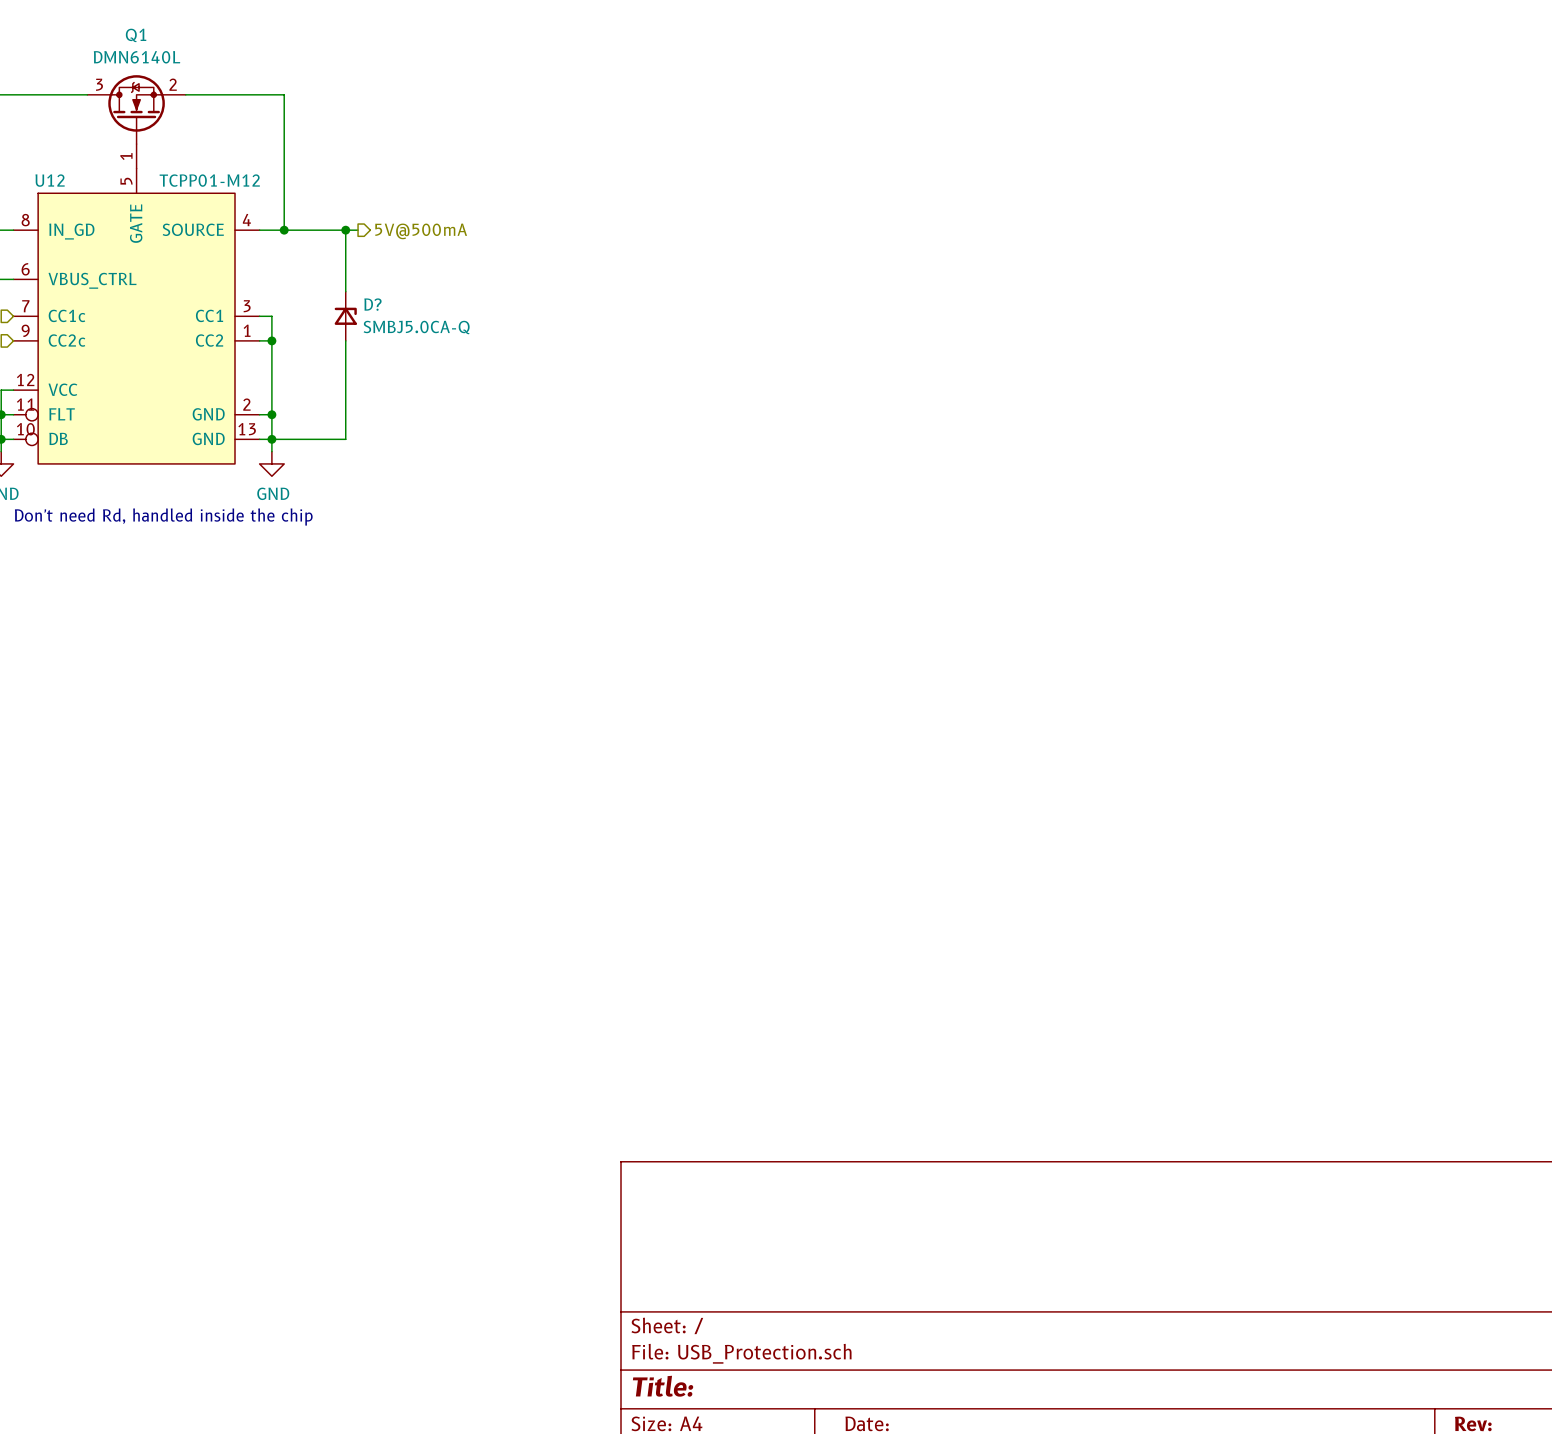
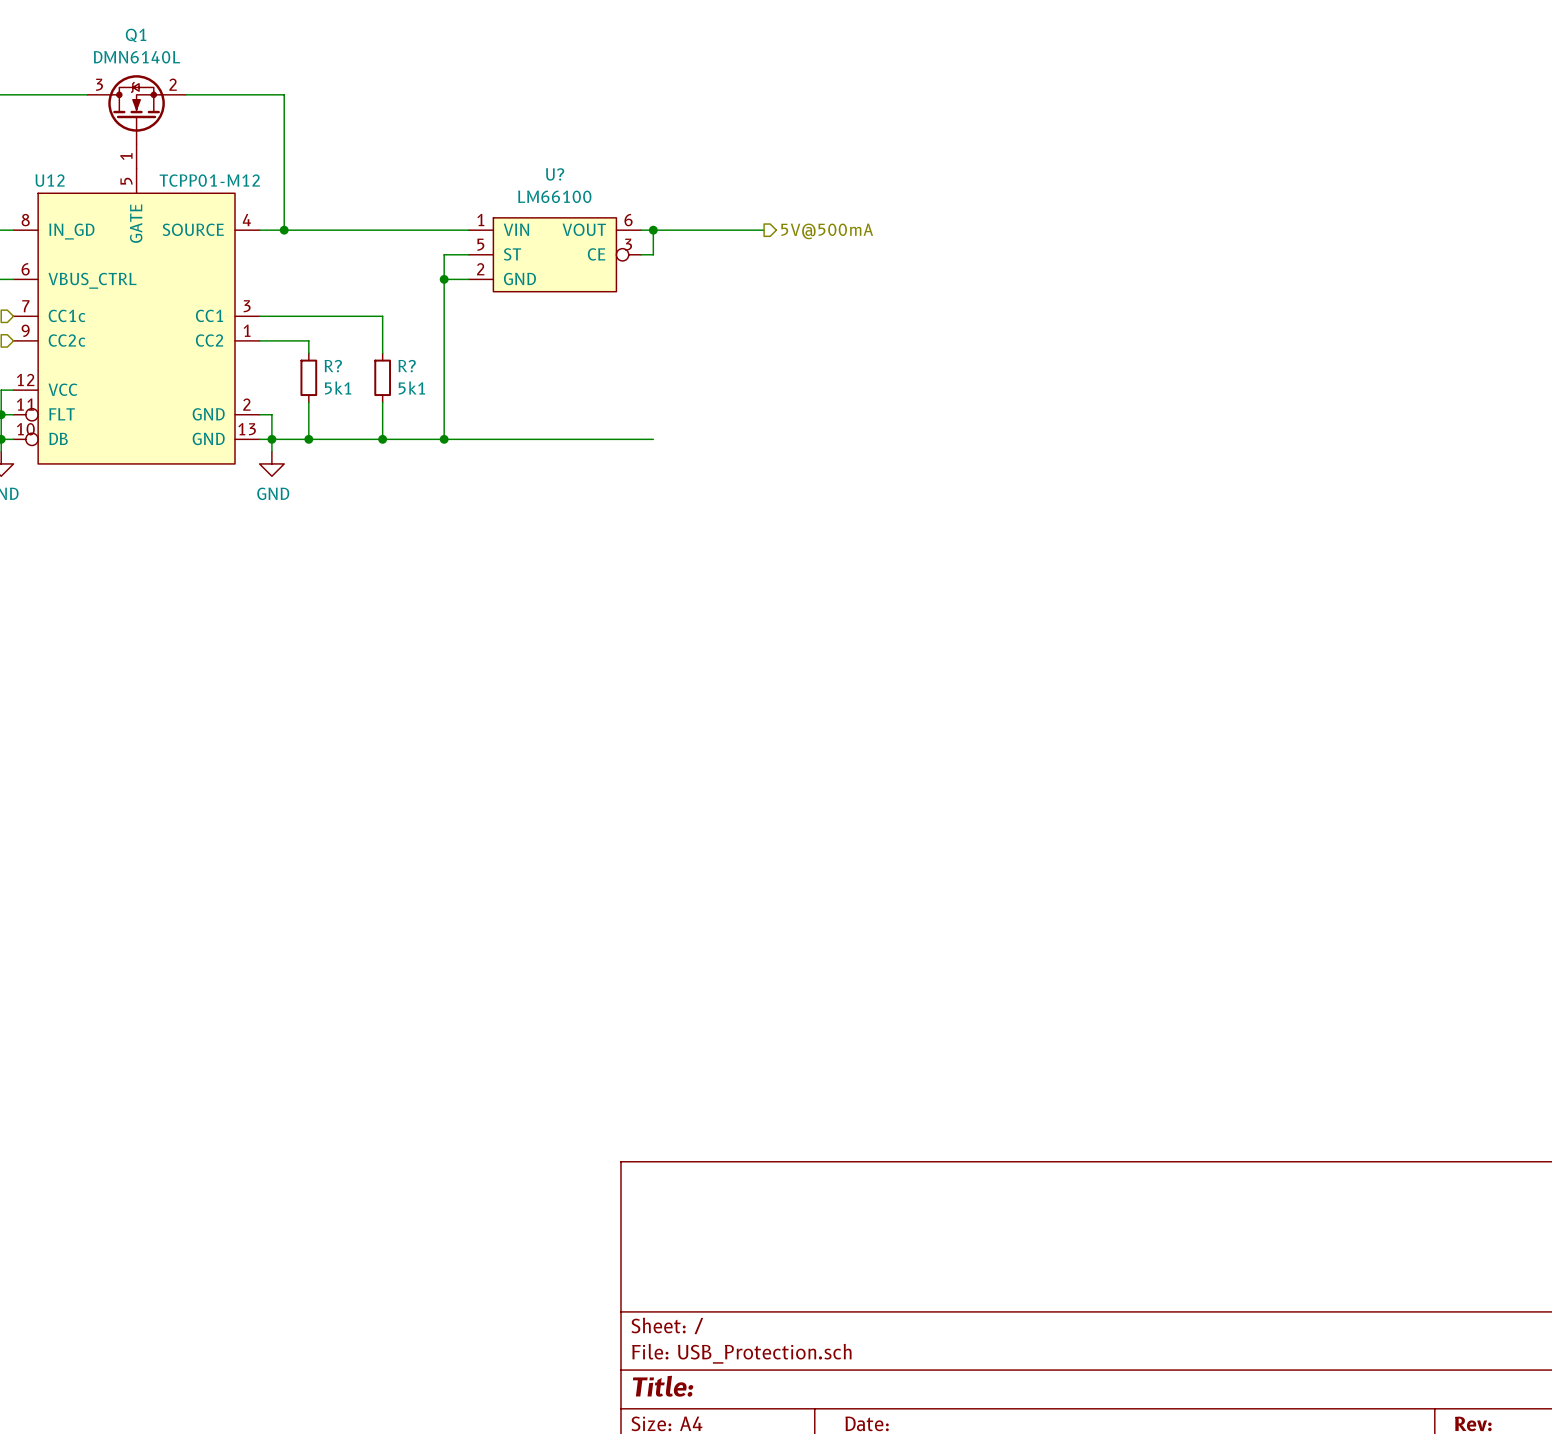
wire: (345, 230) (345, 291) -> none
junction: (345, 230) -> none
wire: none -> (358, 230) (468, 230)
wire: none -> (641, 230) (764, 230)
wire: none -> (653, 230) (653, 254) (641, 254)
junction: none -> (653, 230)
hierarchical label: 5V@500mA (421, 231) -> none
hierarchical label: none -> 5V@500mA (827, 231)
wire: none -> (468, 254) (444, 254) (444, 439)
U?: none -> LM66100 (554, 254)
wire: none -> (444, 279) (468, 279)
junction: none -> (444, 279)
wire: (271, 316) (271, 414) -> (271, 316) (382, 316) (382, 353)
D?: SMBJ5.0CA-Q (345, 316) -> none
wire: none -> (271, 340) (308, 340) (308, 353)
junction: (271, 340) -> none
wire: (345, 340) (345, 439) -> (653, 439) (345, 439)
R?: none -> 5k1 (308, 377)
R?: none -> 5k1 (382, 377)
wire: none -> (308, 402) (308, 439)
wire: none -> (382, 402) (382, 439)
junction position: (271, 414) -> (308, 439)
junction: none -> (382, 439)
junction: none -> (444, 439)
text: Don't need Rd, handled inside the chip (163, 517) -> none

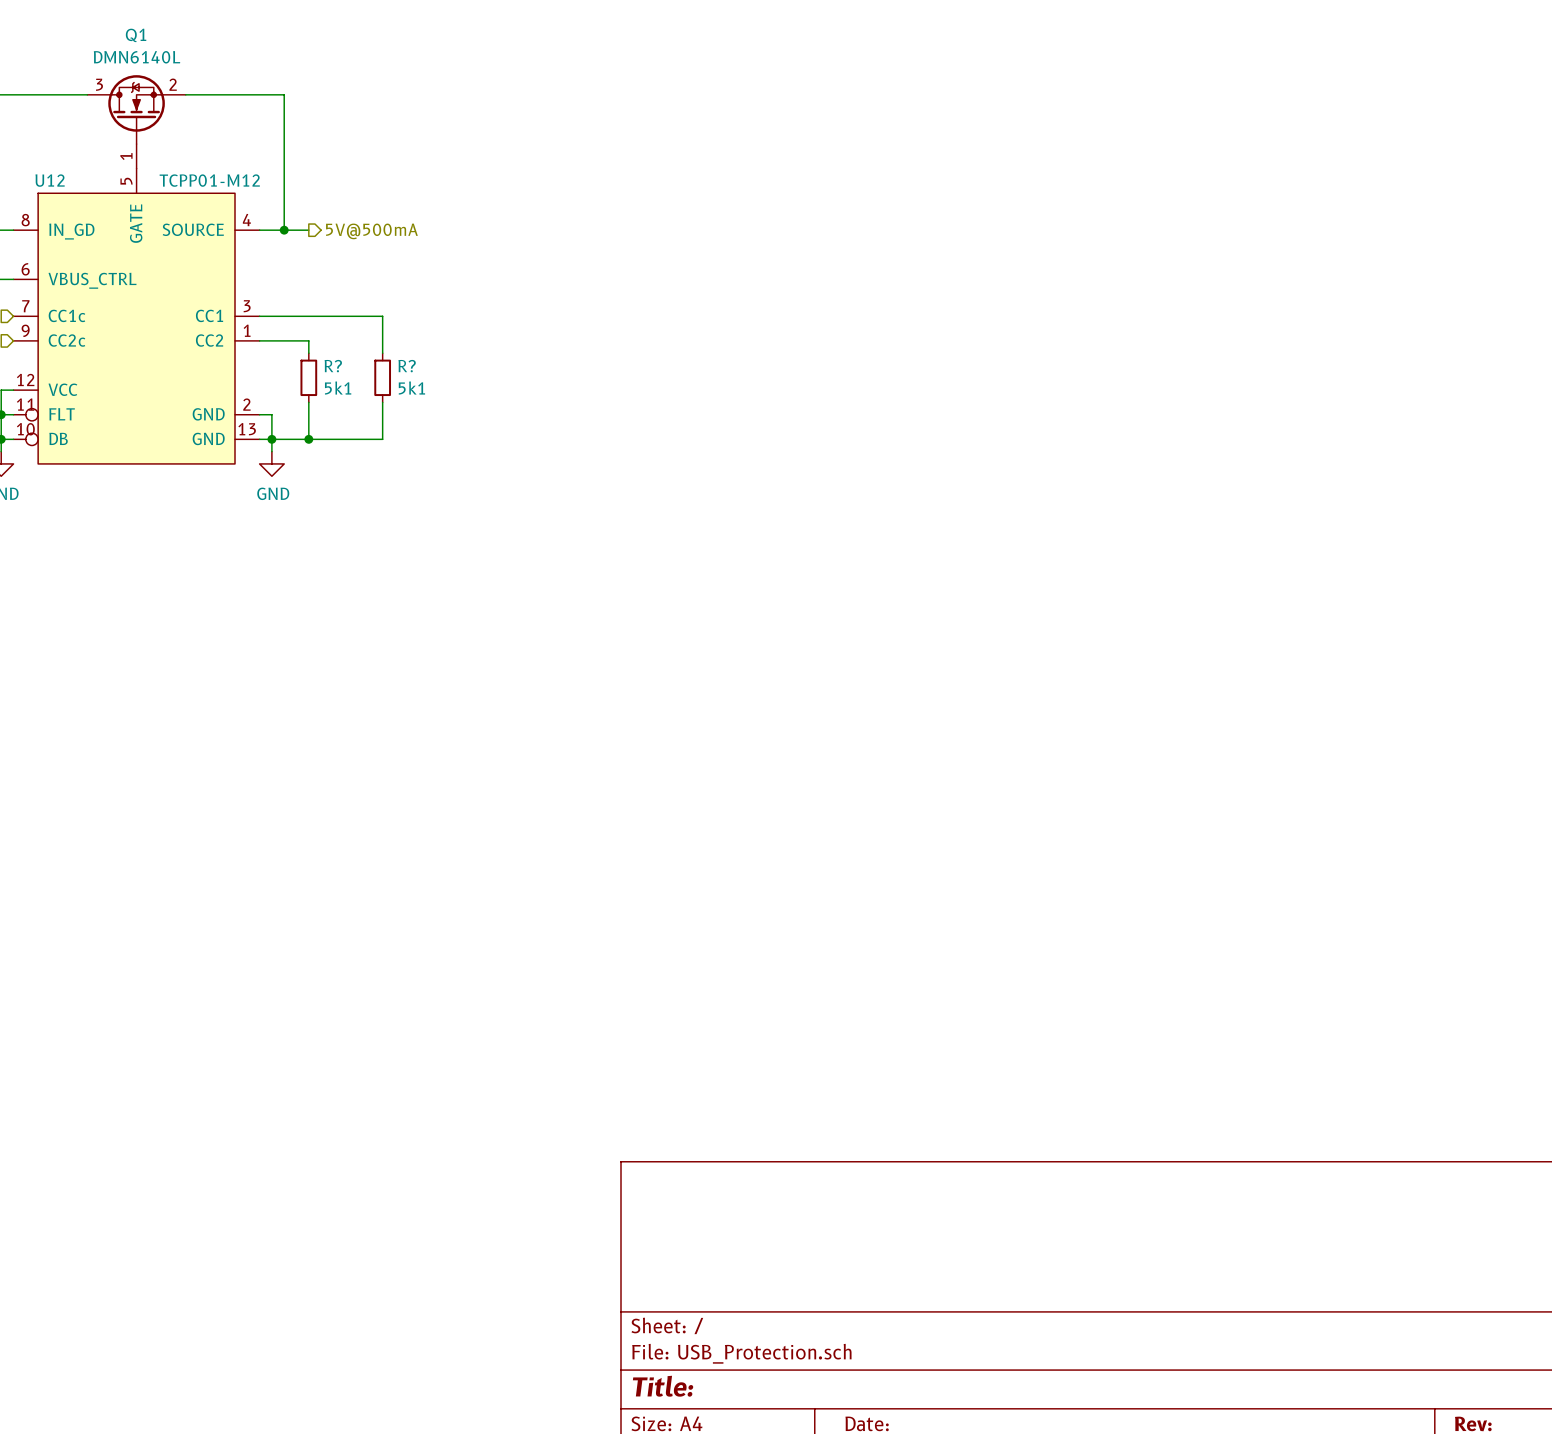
wire: (308, 230) (468, 230) -> none
wire: (641, 230) (764, 230) -> none
wire: (653, 230) (653, 254) (641, 254) -> none
junction: (653, 230) -> none
hierarchical label: none -> 5V@500mA (371, 231)
hierarchical label: 5V@500mA (827, 231) -> none
wire: (468, 254) (444, 254) (444, 439) -> none
U?: LM66100 (554, 254) -> none
wire: (444, 279) (468, 279) -> none
junction: (444, 279) -> none
wire: (382, 439) (653, 439) -> none
junction: (382, 439) -> none
junction: (444, 439) -> none

